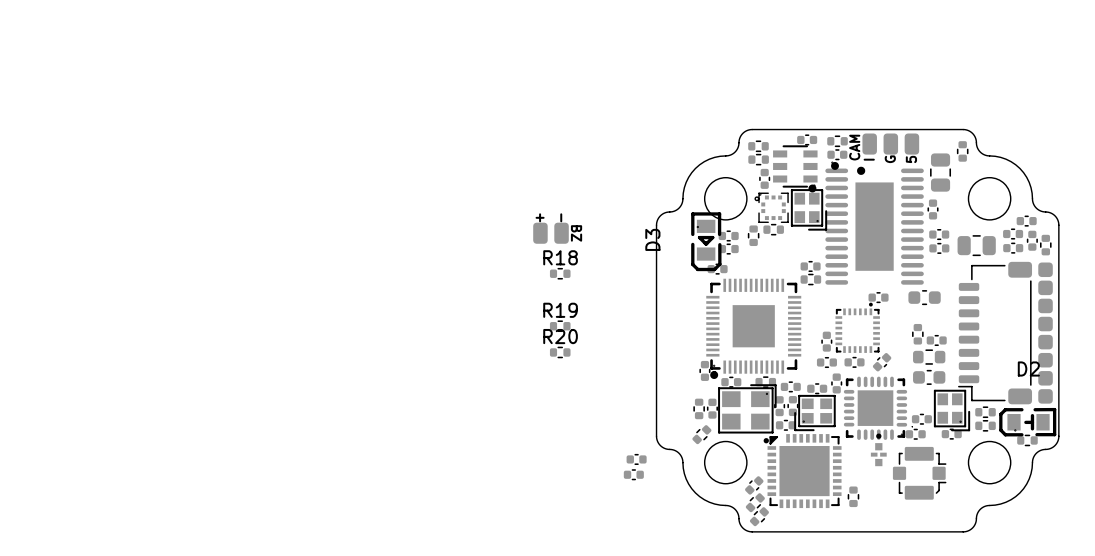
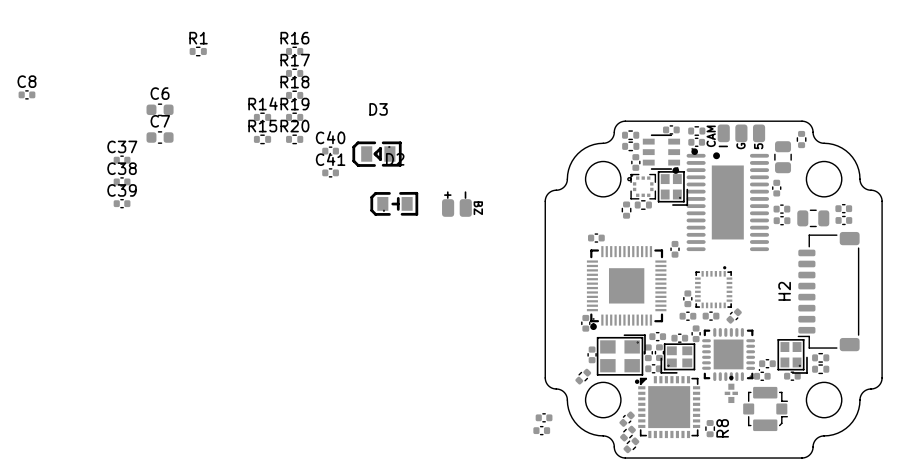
R1: none -> (198, 51)
R16: none -> (294, 51)
R17: none -> (294, 73)
C8: none -> (26, 94)
C6: none -> (160, 109)
R14: none -> (262, 117)
C7: none -> (160, 137)
R15: none -> (262, 139)
C40: none -> (330, 151)
C37: none -> (122, 160)
C41: none -> (330, 172)
C38: none -> (122, 181)
part: (1026, 221) -> none
C39: none -> (122, 203)
part: (728, 235) -> none
part: (1032, 240) -> none
D3 rotation: 0° (706, 241) -> 90° clockwise (377, 154)
D3 position: (706, 241) -> (377, 154)
part: (1045, 245) -> none
part: (728, 249) -> none
part: (810, 266) -> none
R18 position: (560, 273) -> (294, 95)
part footprint: [800, 273, 822, 286] -> [670, 240, 680, 258]
part: (878, 297) -> none
part: (924, 297) -> none
R19 position: (560, 326) -> (294, 117)
H2: none -> (828, 291)
part: (1005, 333) -> none
part: (917, 334) -> none
part: (936, 340) -> none
R20 position: (560, 352) -> (294, 139)
part: (929, 357) -> none
part: (929, 377) -> none
part: (731, 382) -> none
part: (765, 382) -> none
part: (699, 408) -> none
D2 position: (1027, 422) -> (394, 203)
part: (1027, 440) -> none
part: (636, 459) -> none
part: (633, 474) -> none
part: none -> (544, 417)
R8 name: none -> R8 (722, 428)
part: none -> (541, 430)

